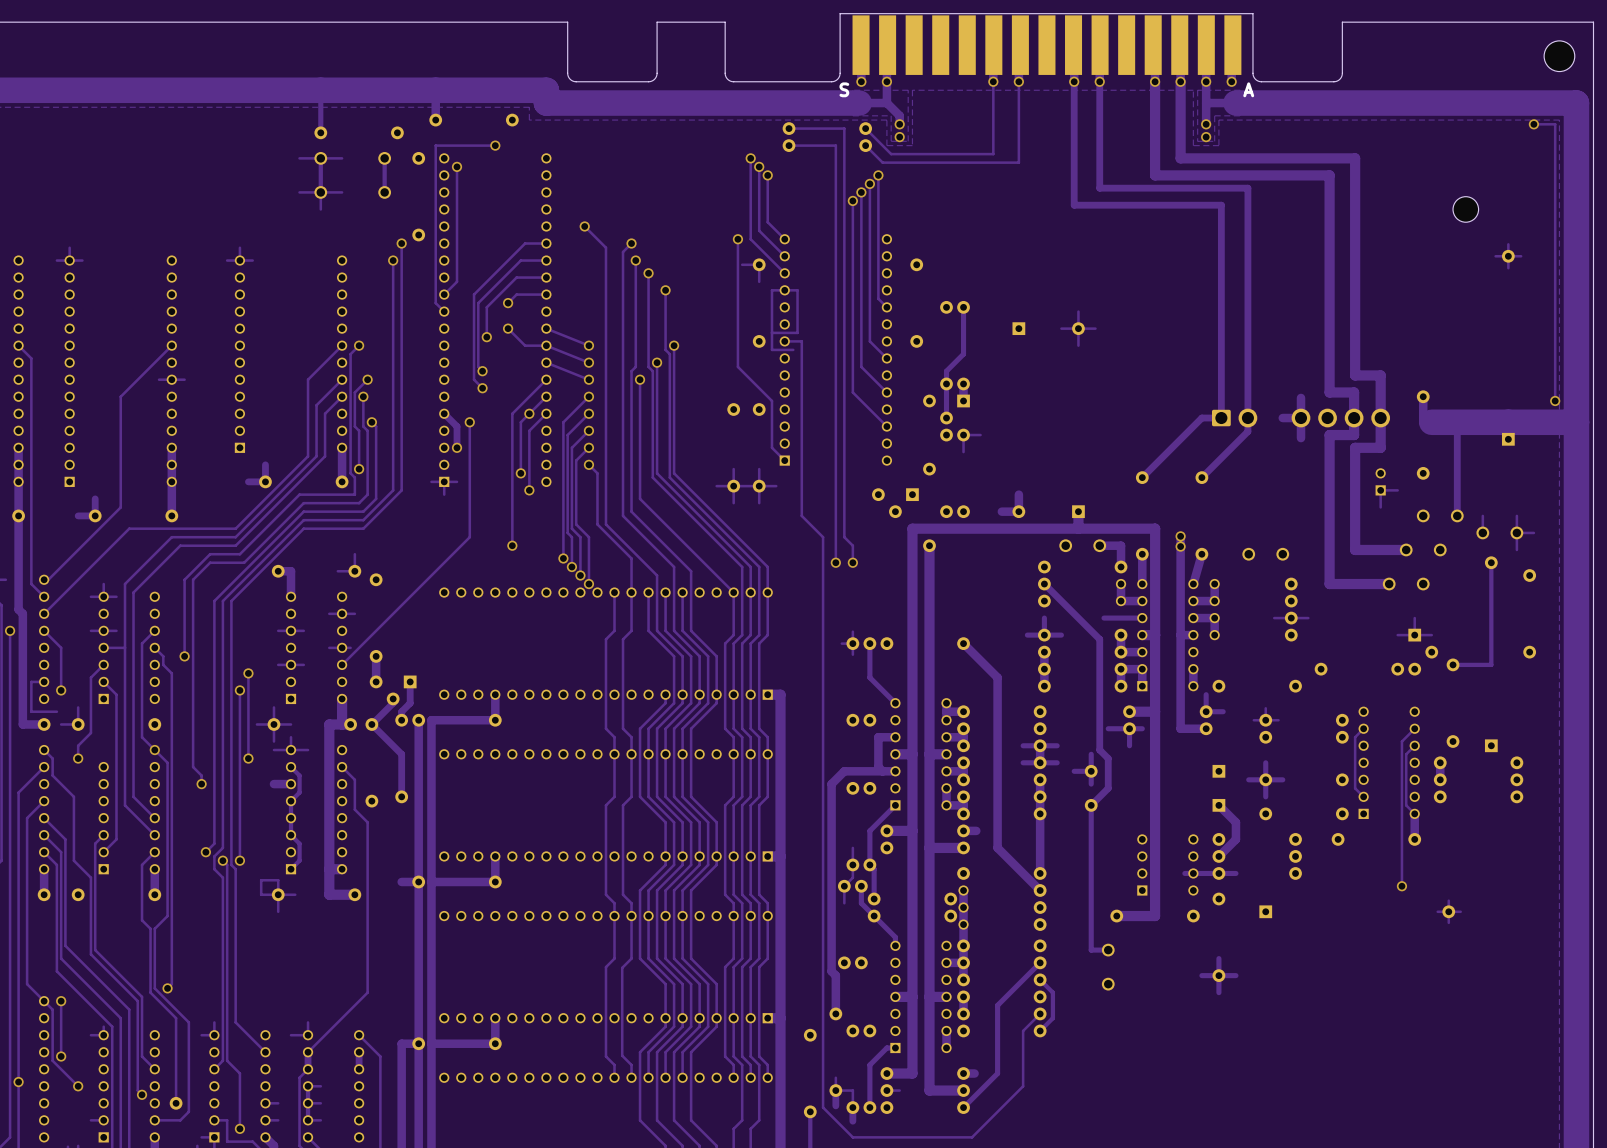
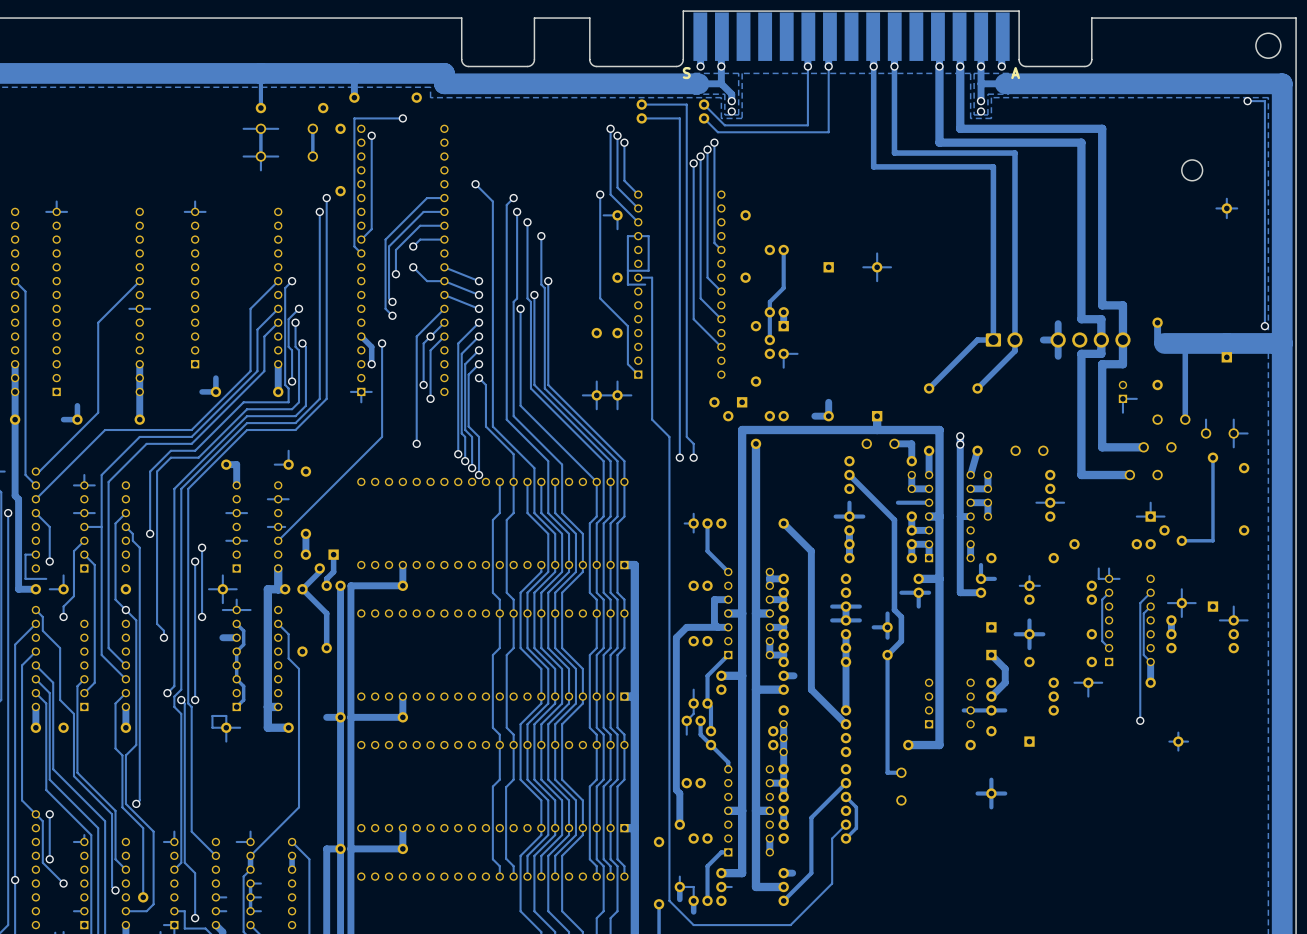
track: none -> (1098, 568) (1098, 578) (1119, 578)
track: none -> (1109, 568) (1109, 578)
track: none -> (1181, 589) (1181, 616)
track: none -> (1195, 603) (1167, 603)
track: none -> (1233, 606) (1233, 620)
track: none -> (1247, 620) (1219, 620)
track: none -> (1088, 682) (1088, 696)
track: none -> (1102, 682) (1074, 682)

